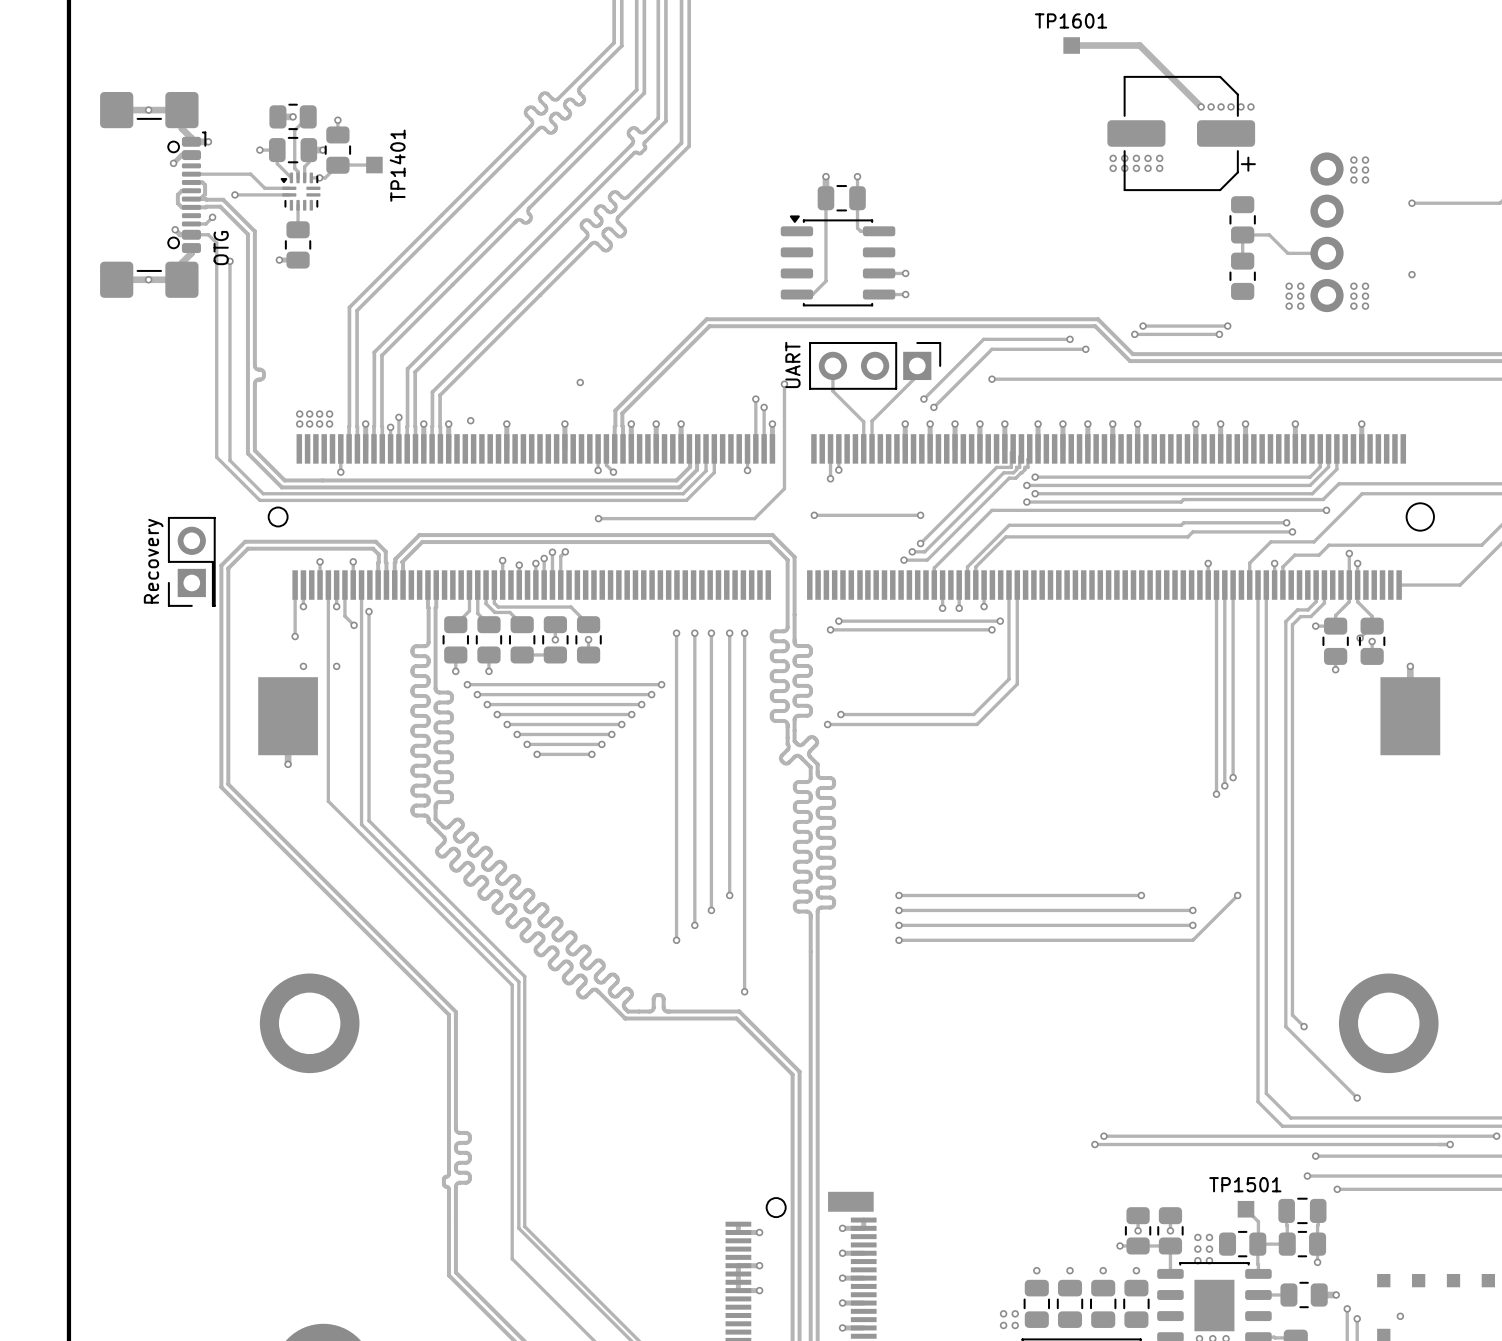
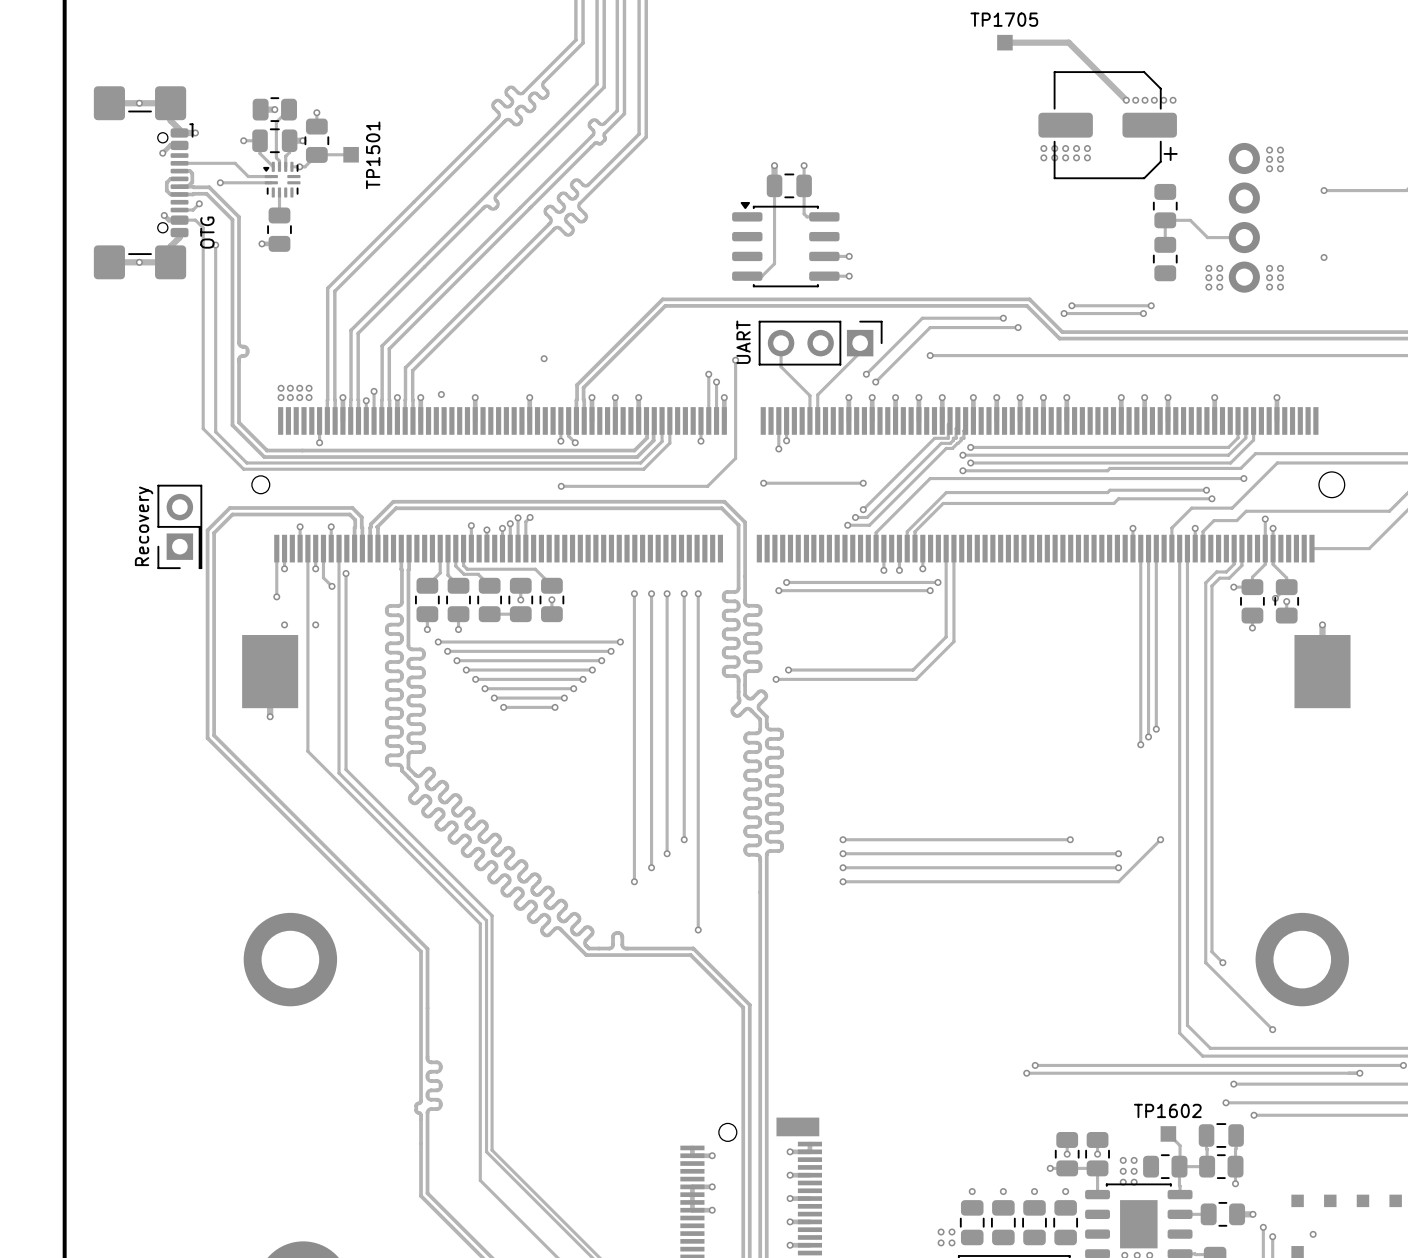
TP1601 name: TP1601 (1071, 20) -> TP1705 (1004, 19)
TP1401 name: TP1401 (397, 165) -> TP1501 (373, 155)
TP1501 name: TP1501 (1245, 1184) -> TP1602 (1167, 1110)

